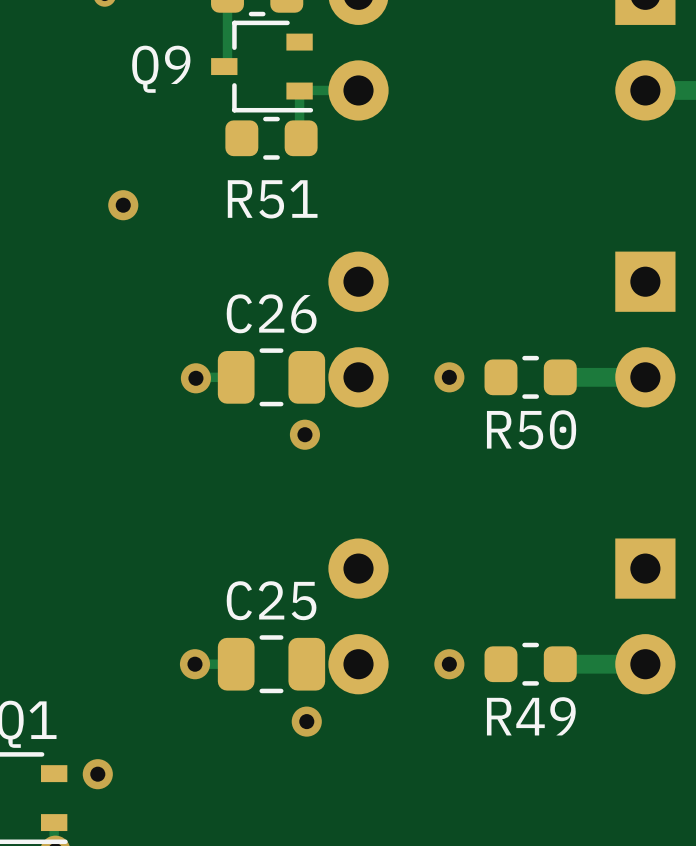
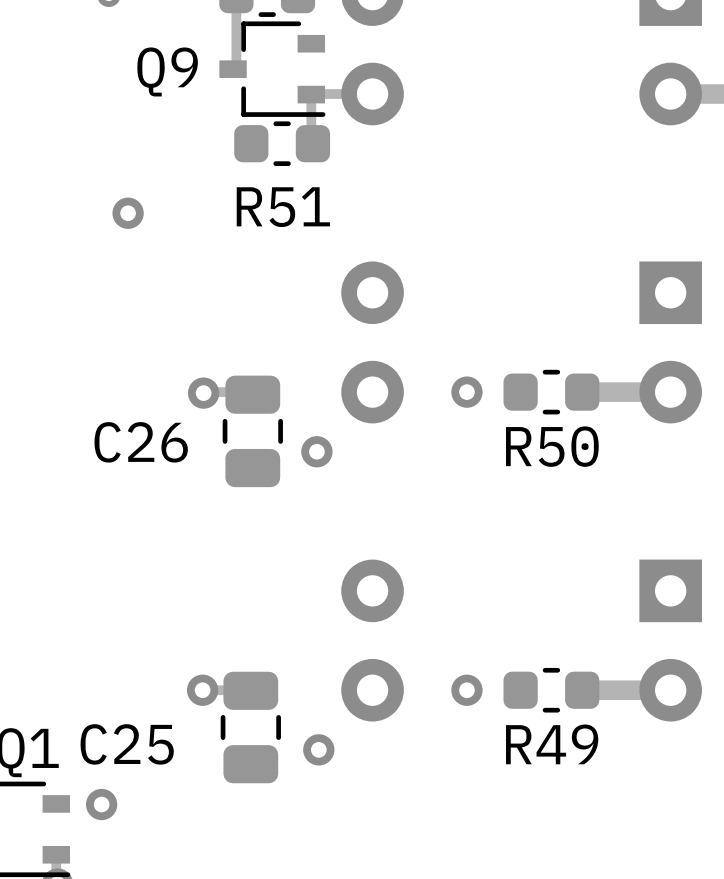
C26 name position: C26 (271, 313) -> C26 (141, 442)
C26 rotation: 0° (271, 377) -> 90° clockwise (252, 431)
C25 name position: C25 (271, 600) -> C25 (127, 744)
C25 rotation: 0° (271, 664) -> 90° clockwise (250, 727)

